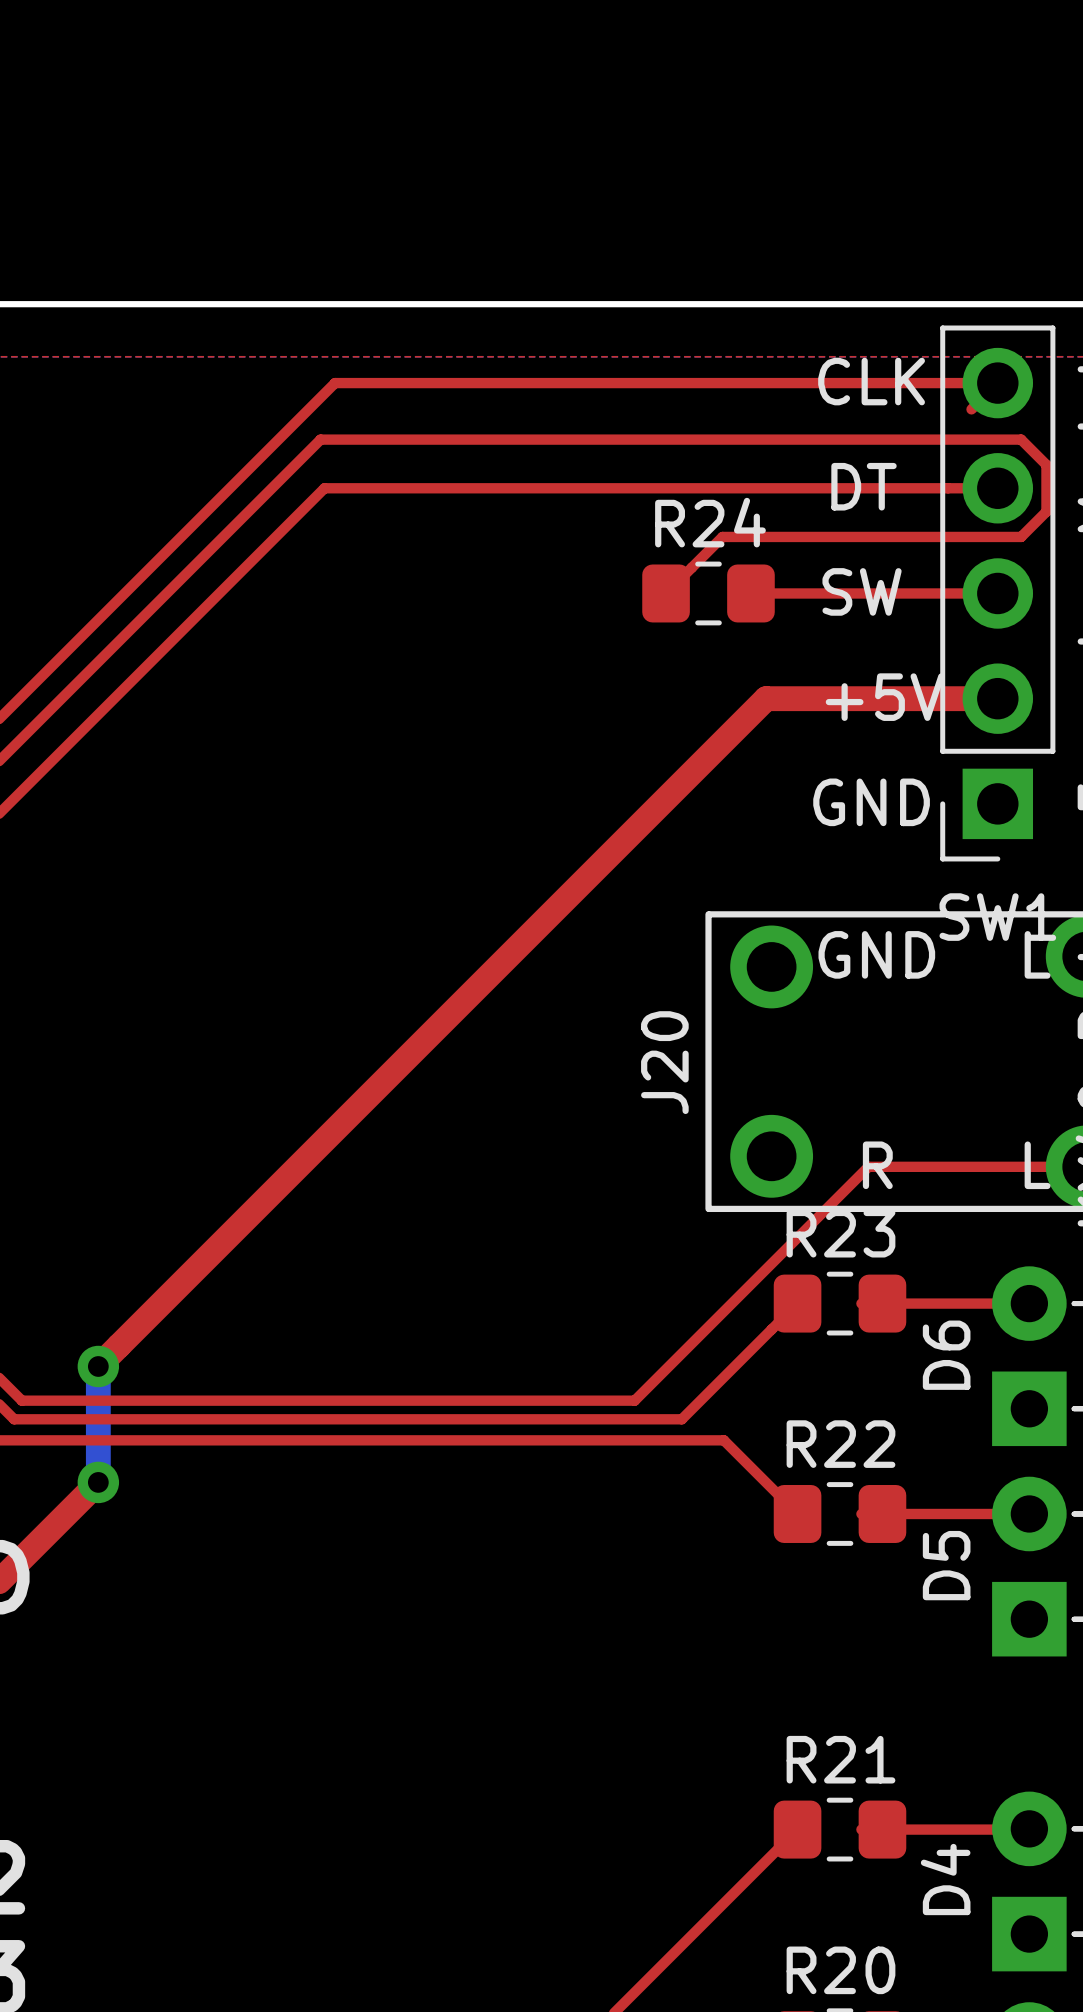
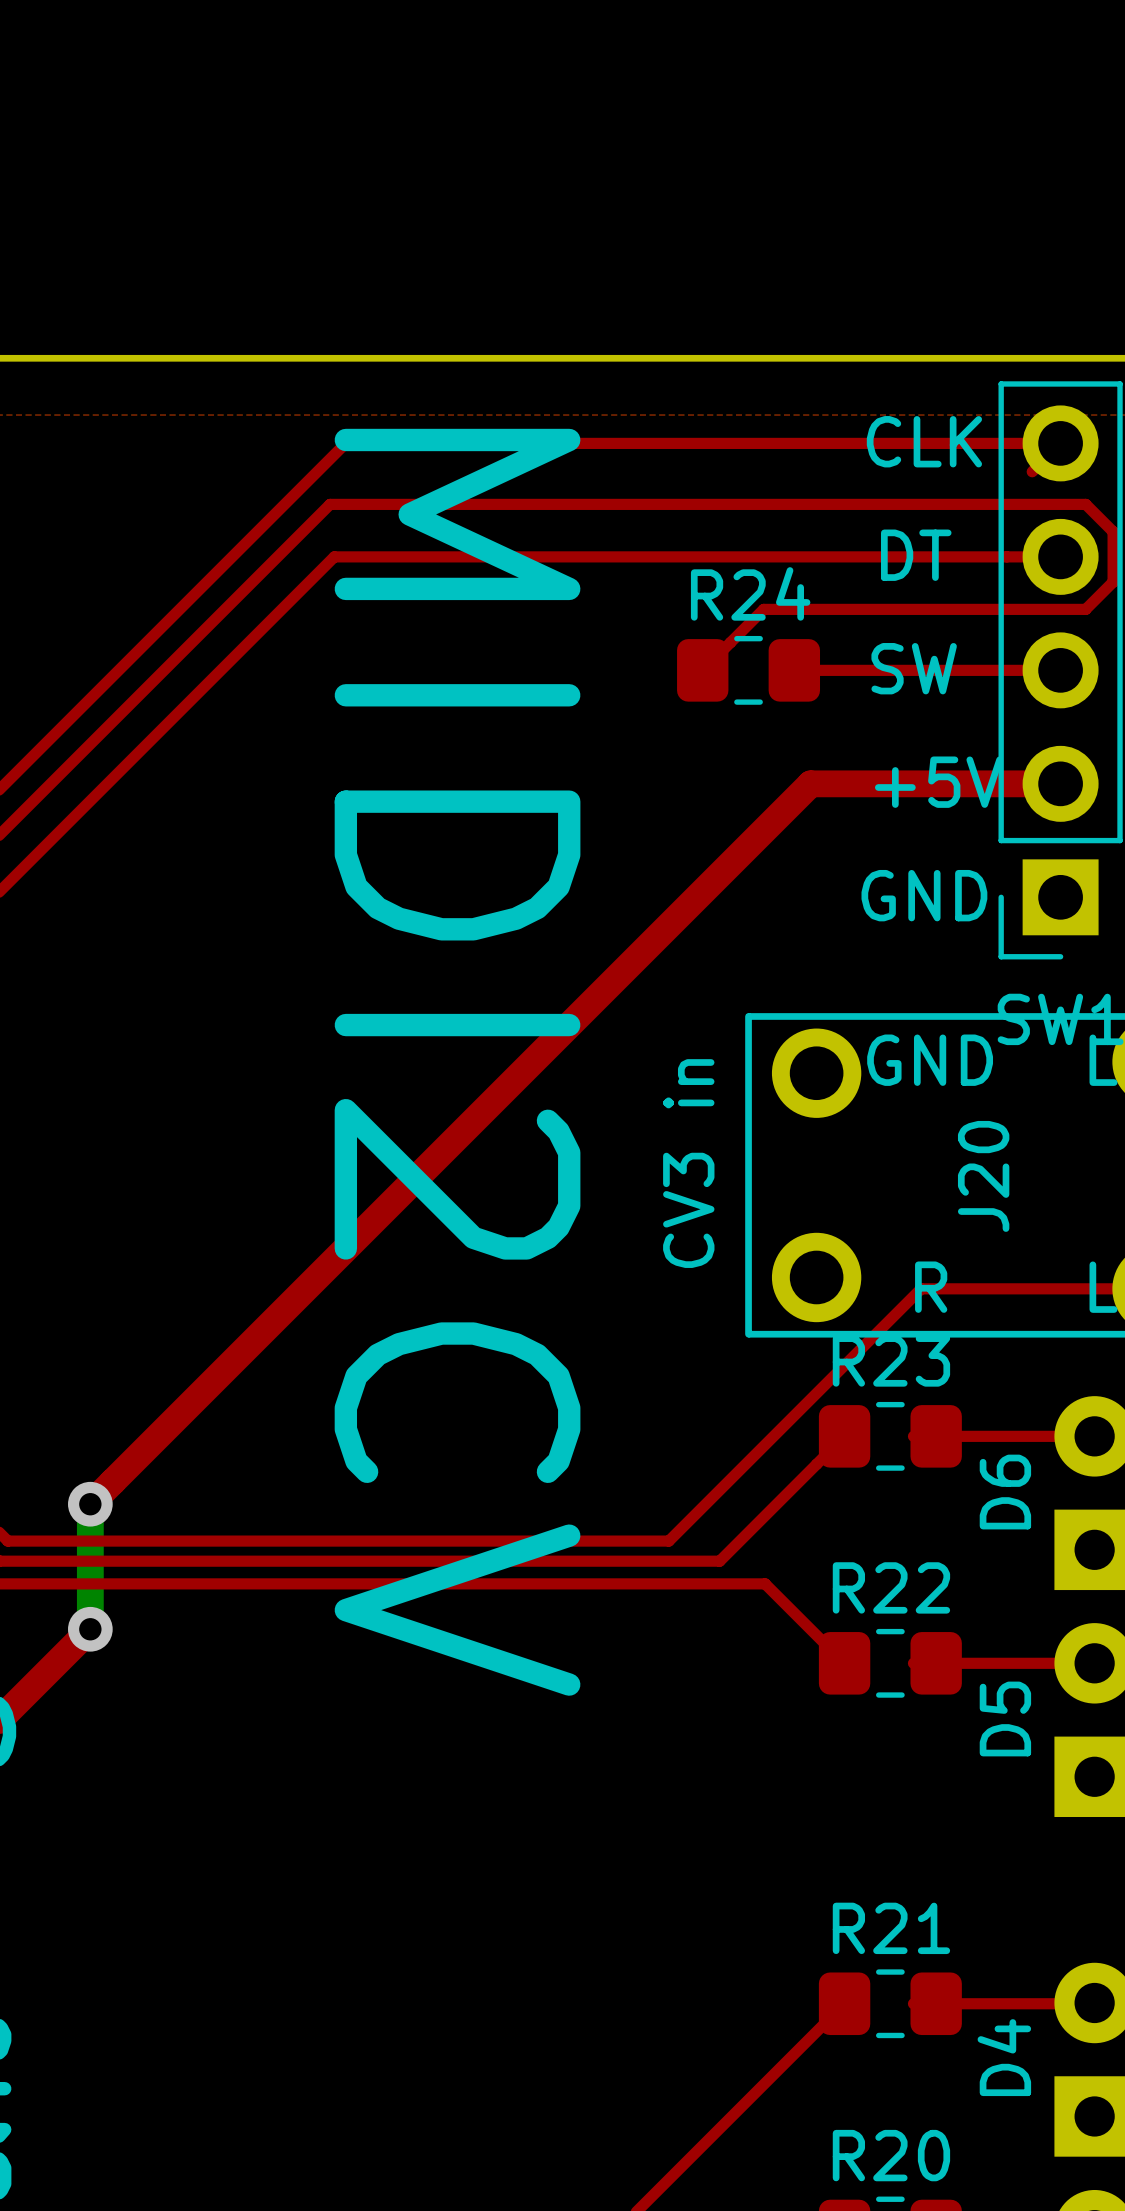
text: none -> MIDI2CV (457, 1062)
J20 value: none -> CV3 in (688, 1163)
J20 name position: J20 (664, 1062) -> J20 (983, 1176)

